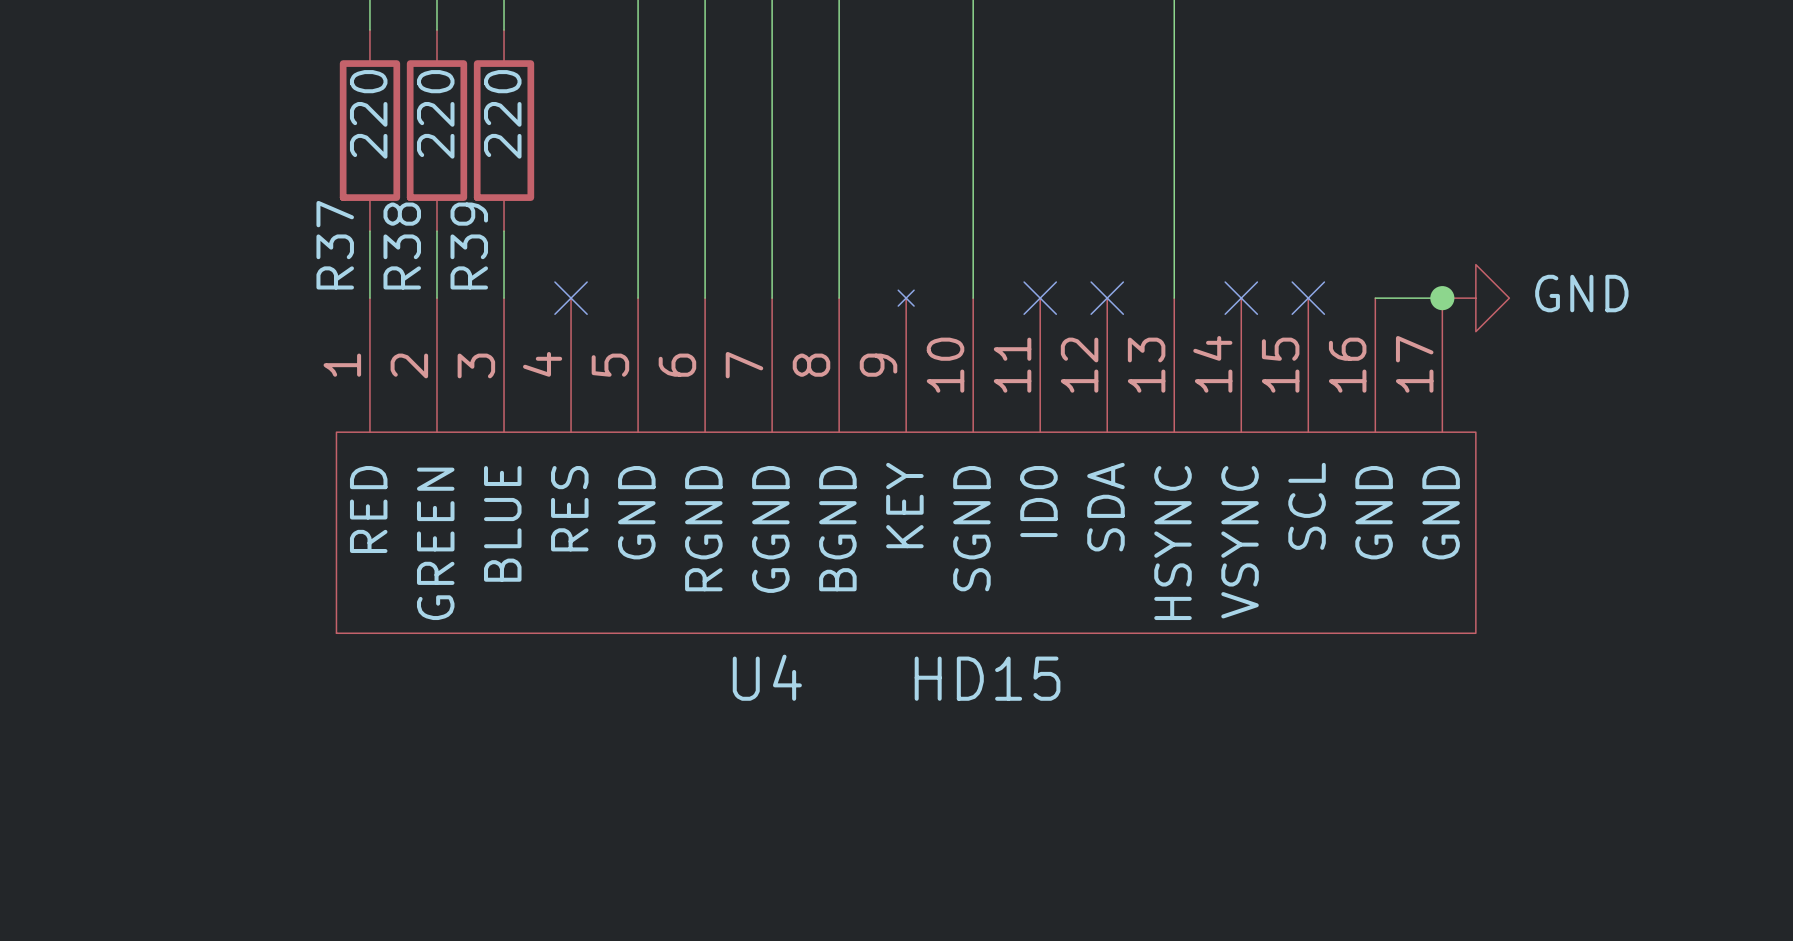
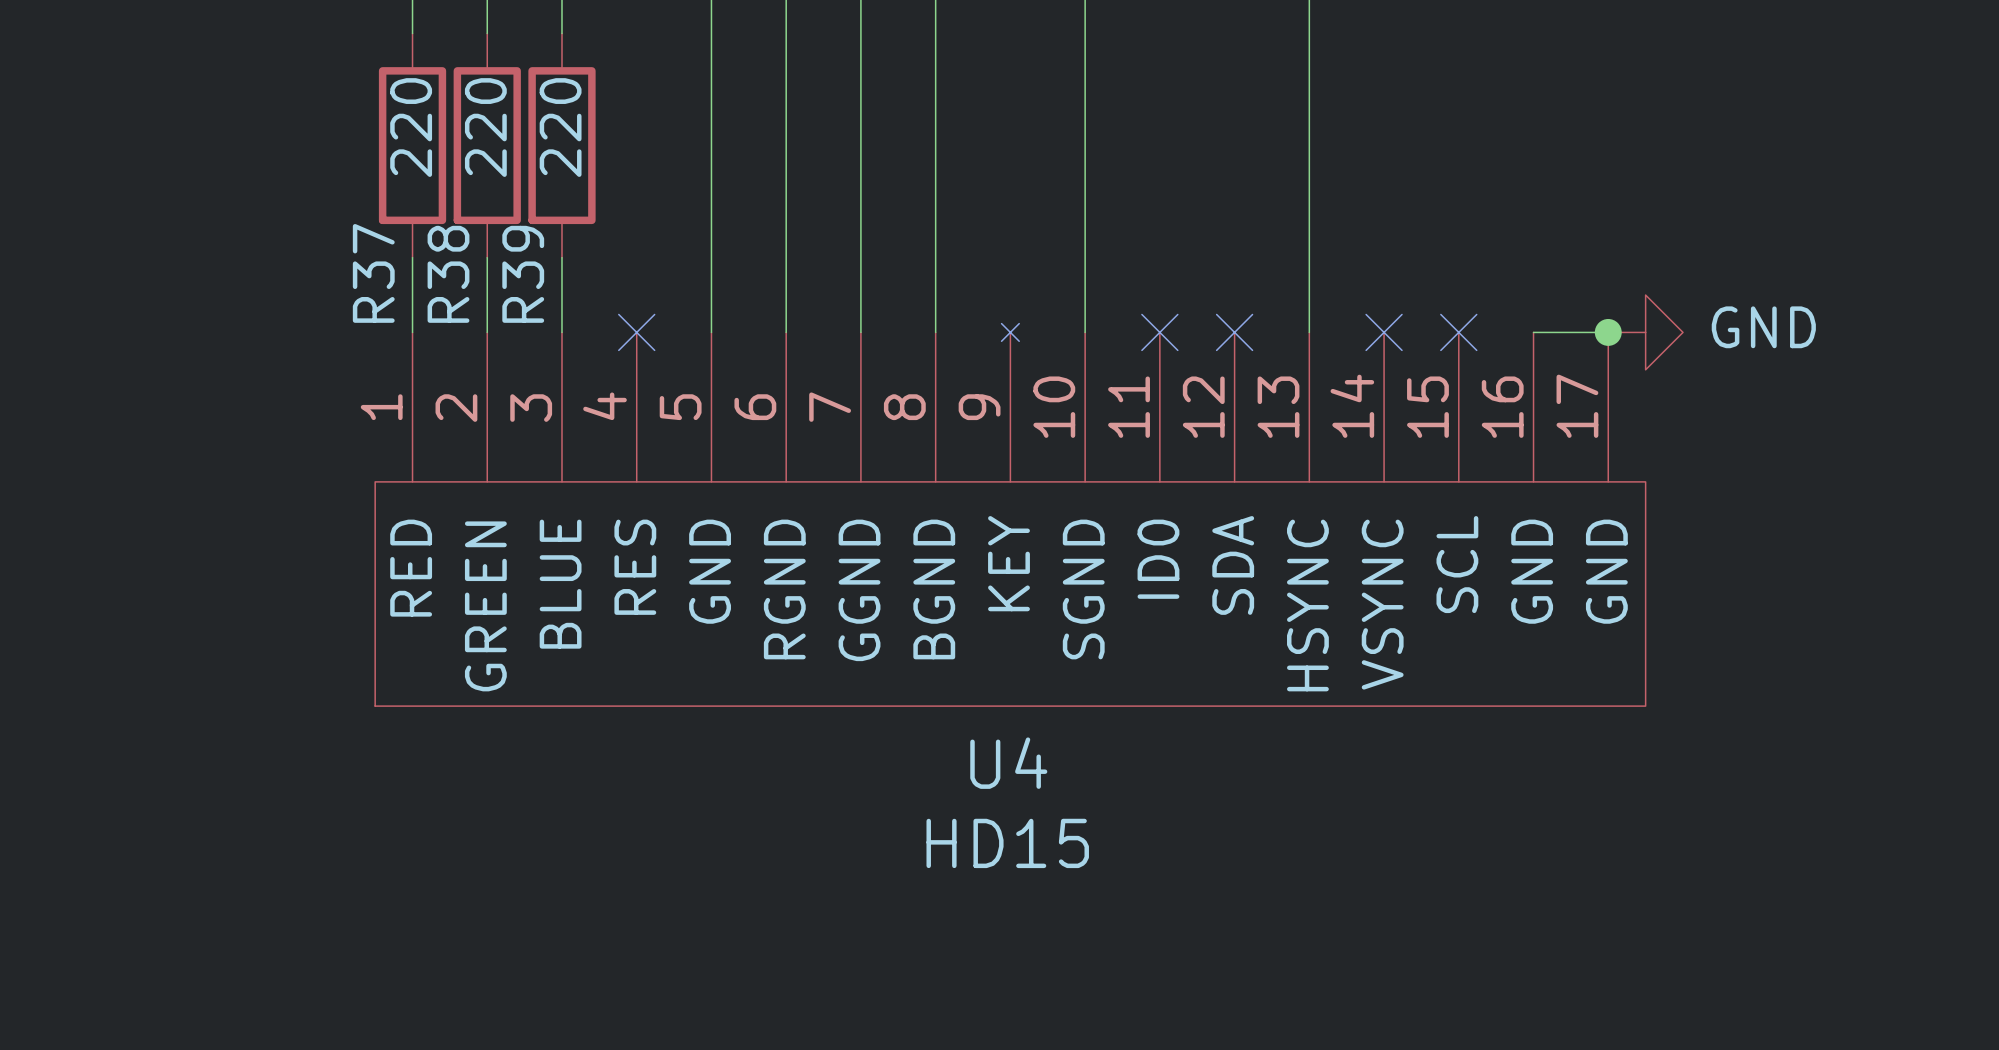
U4 name position: U4 (767, 677) -> U4 (1008, 763)
U4 value position: HD15 (987, 678) -> HD15 (1007, 843)

